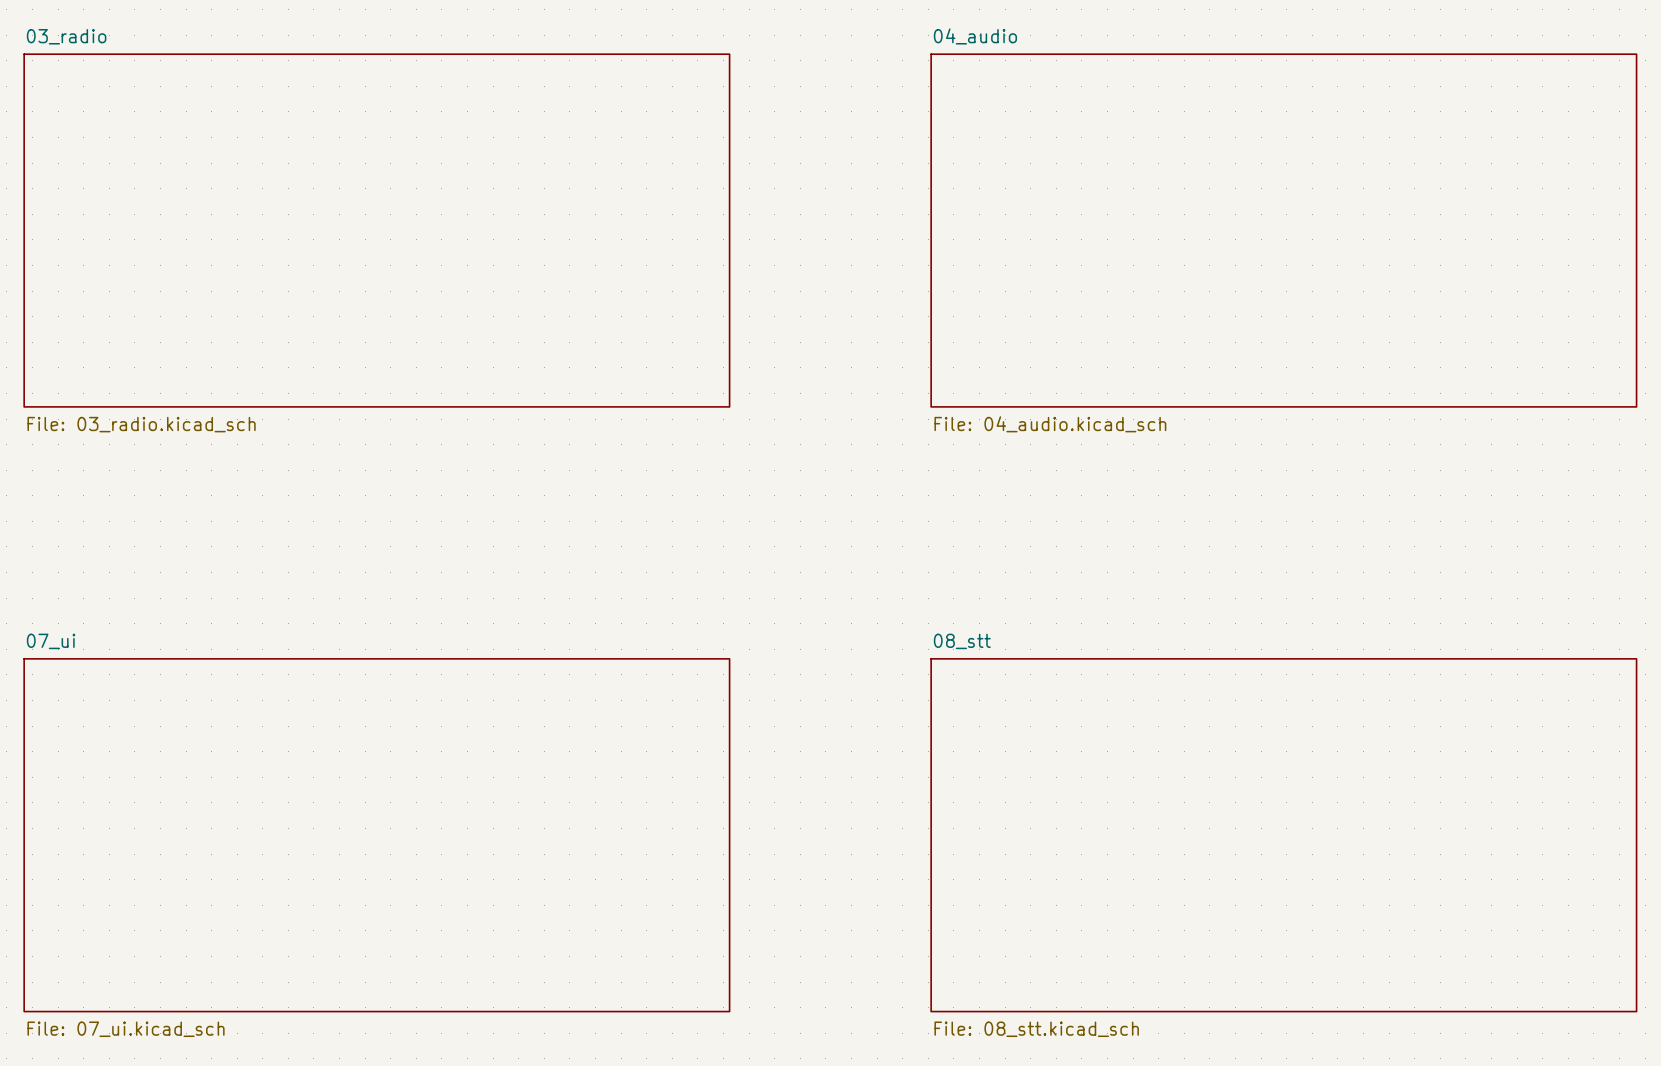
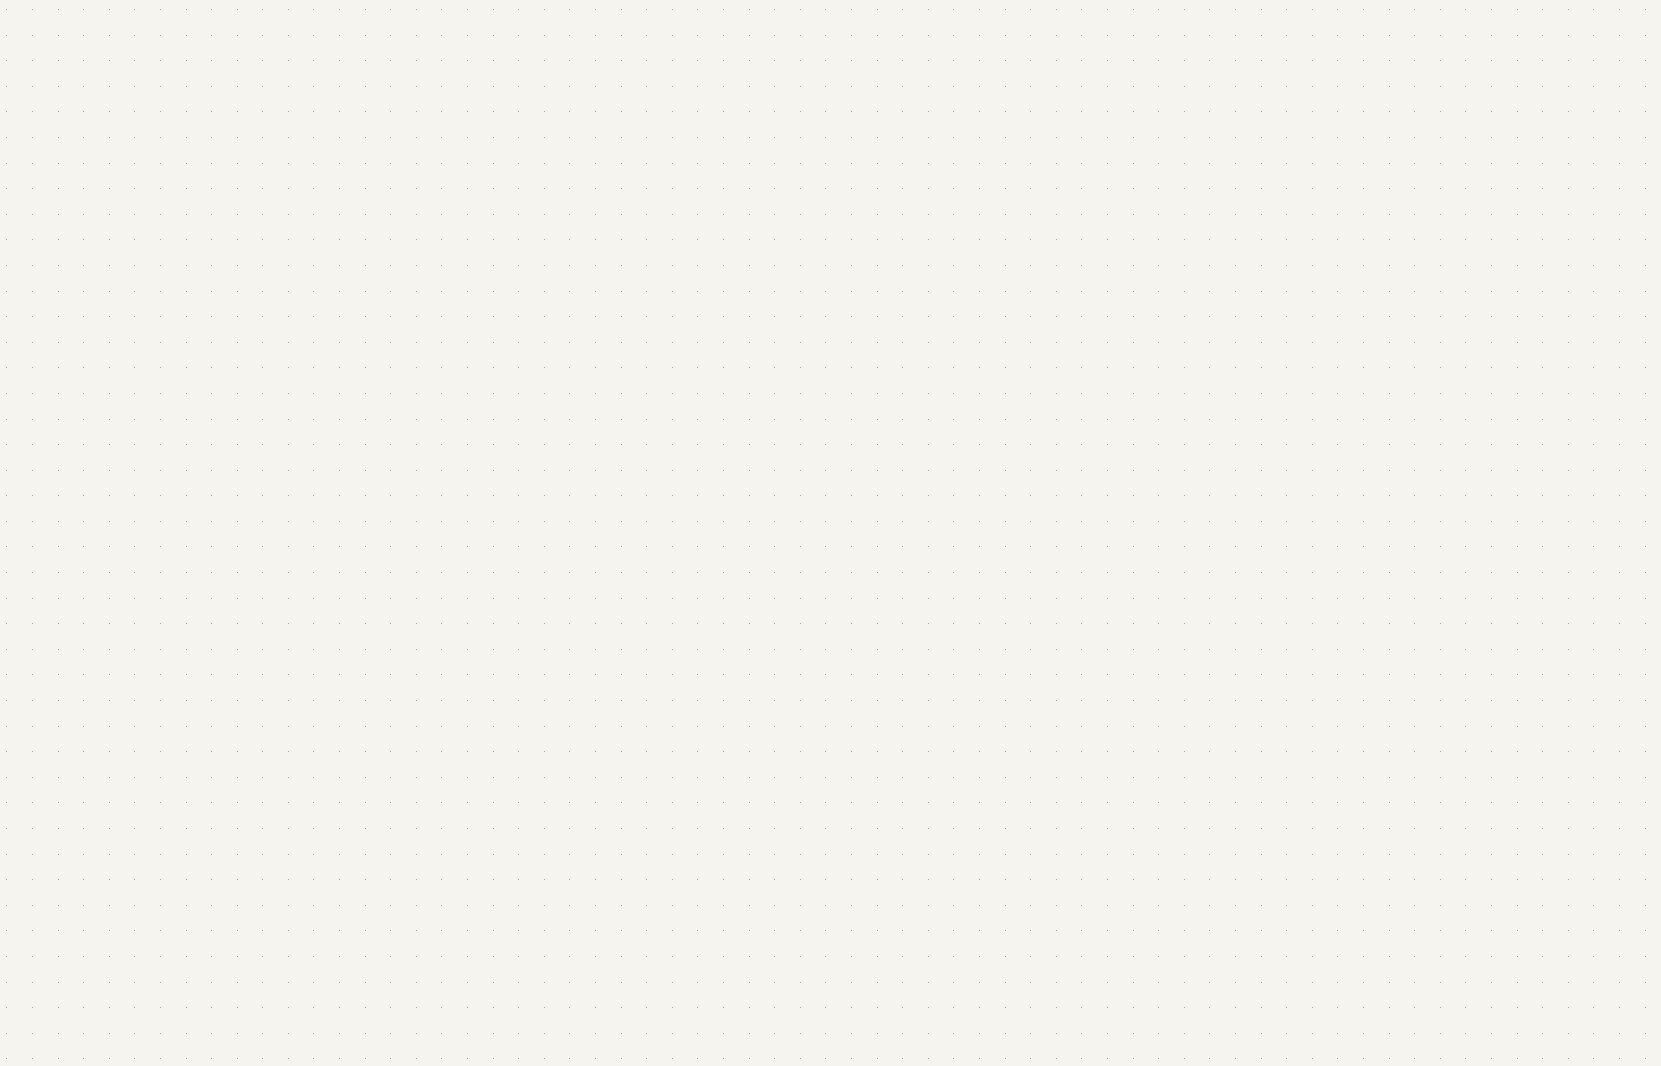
sheet 03_radio: File: 03_radio.kicad_sch (376, 230) -> none
sheet 04_audio: File: 04_audio.kicad_sch (1283, 230) -> none
sheet 07_ui: File: 07_ui.kicad_sch (376, 835) -> none
sheet 08_stt: File: 08_stt.kicad_sch (1283, 835) -> none

